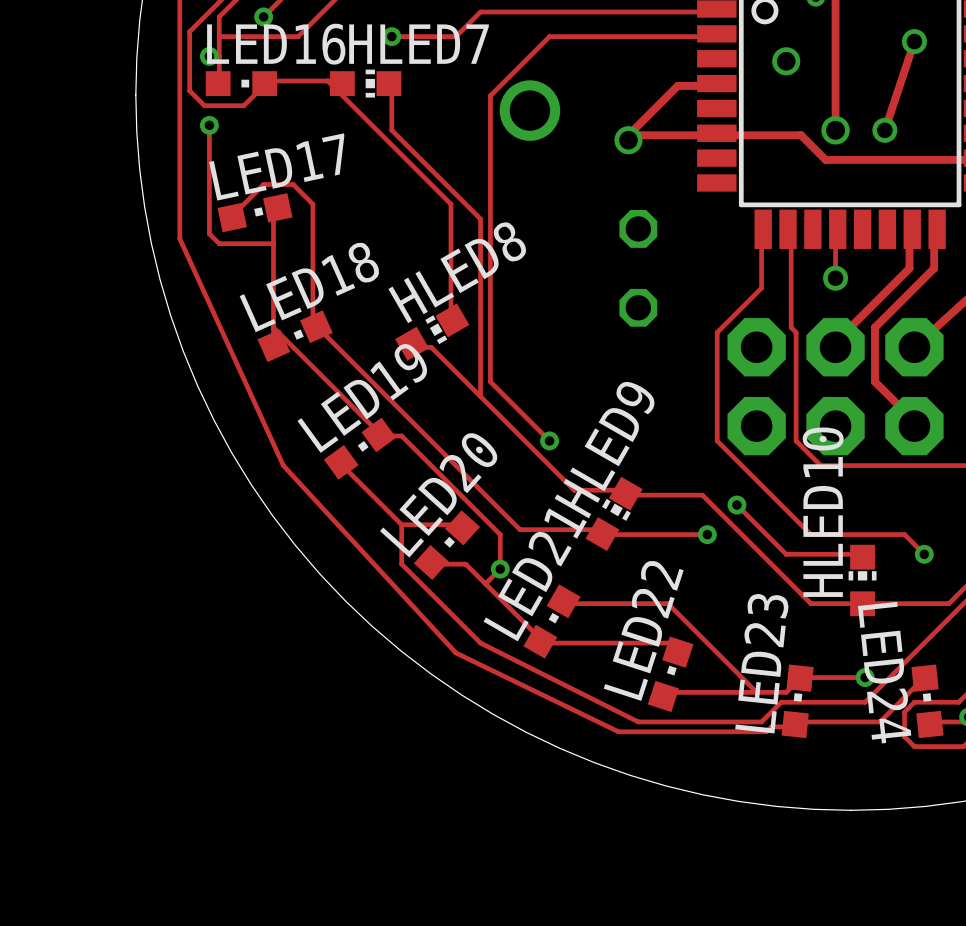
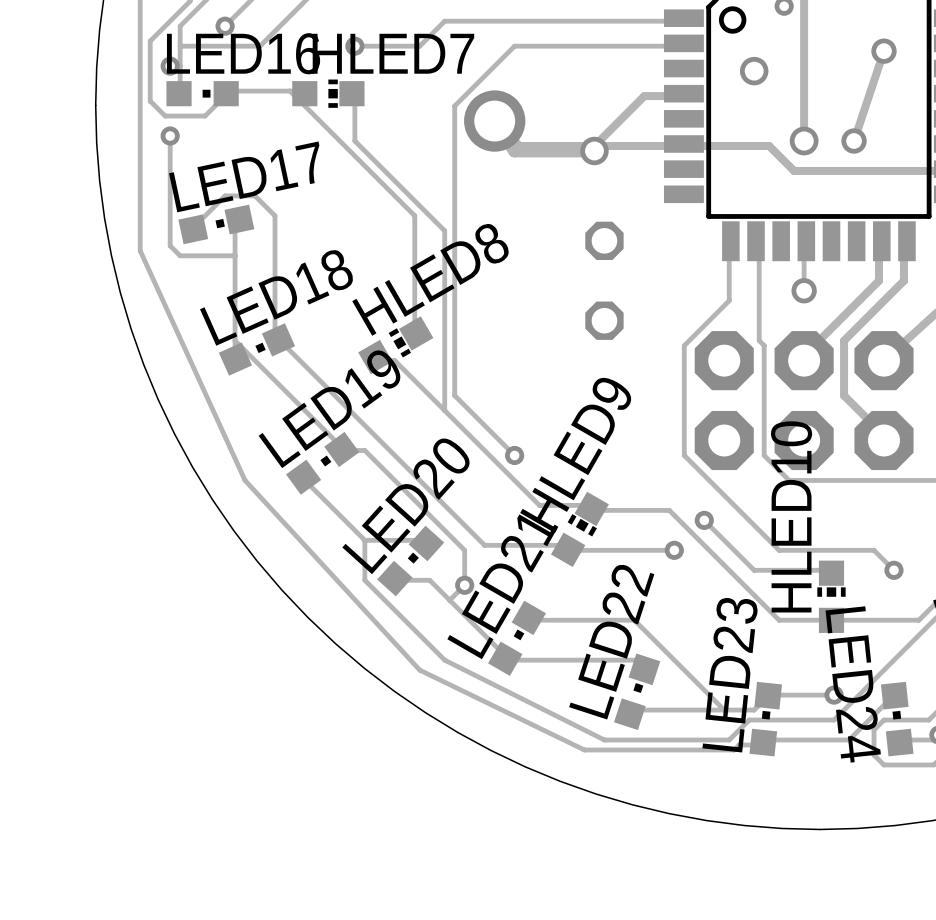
track: none -> (594, 146) (519, 146) (494, 121) (514, 150) (594, 150)

